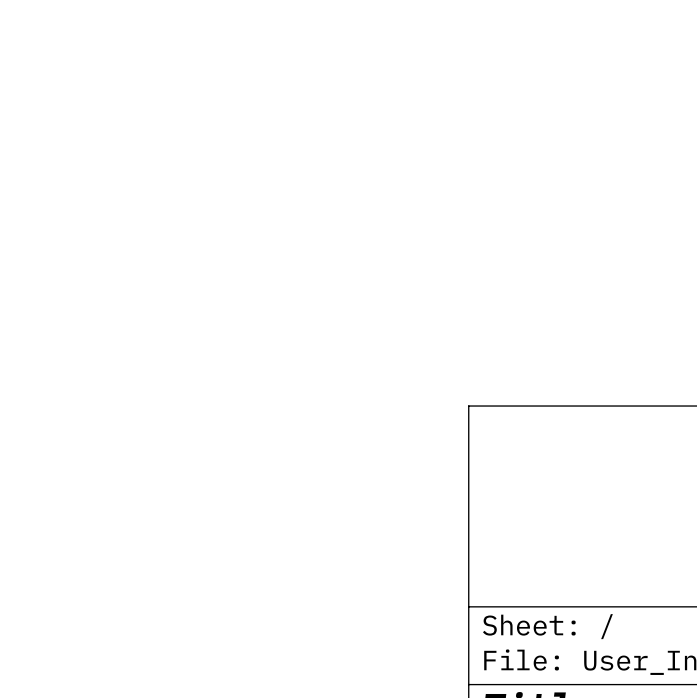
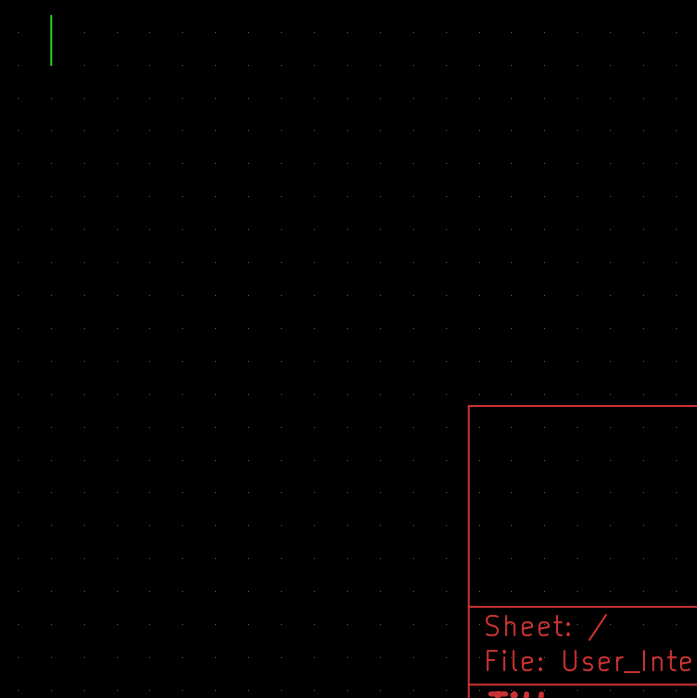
wire: none -> (51, 15) (51, 65)

